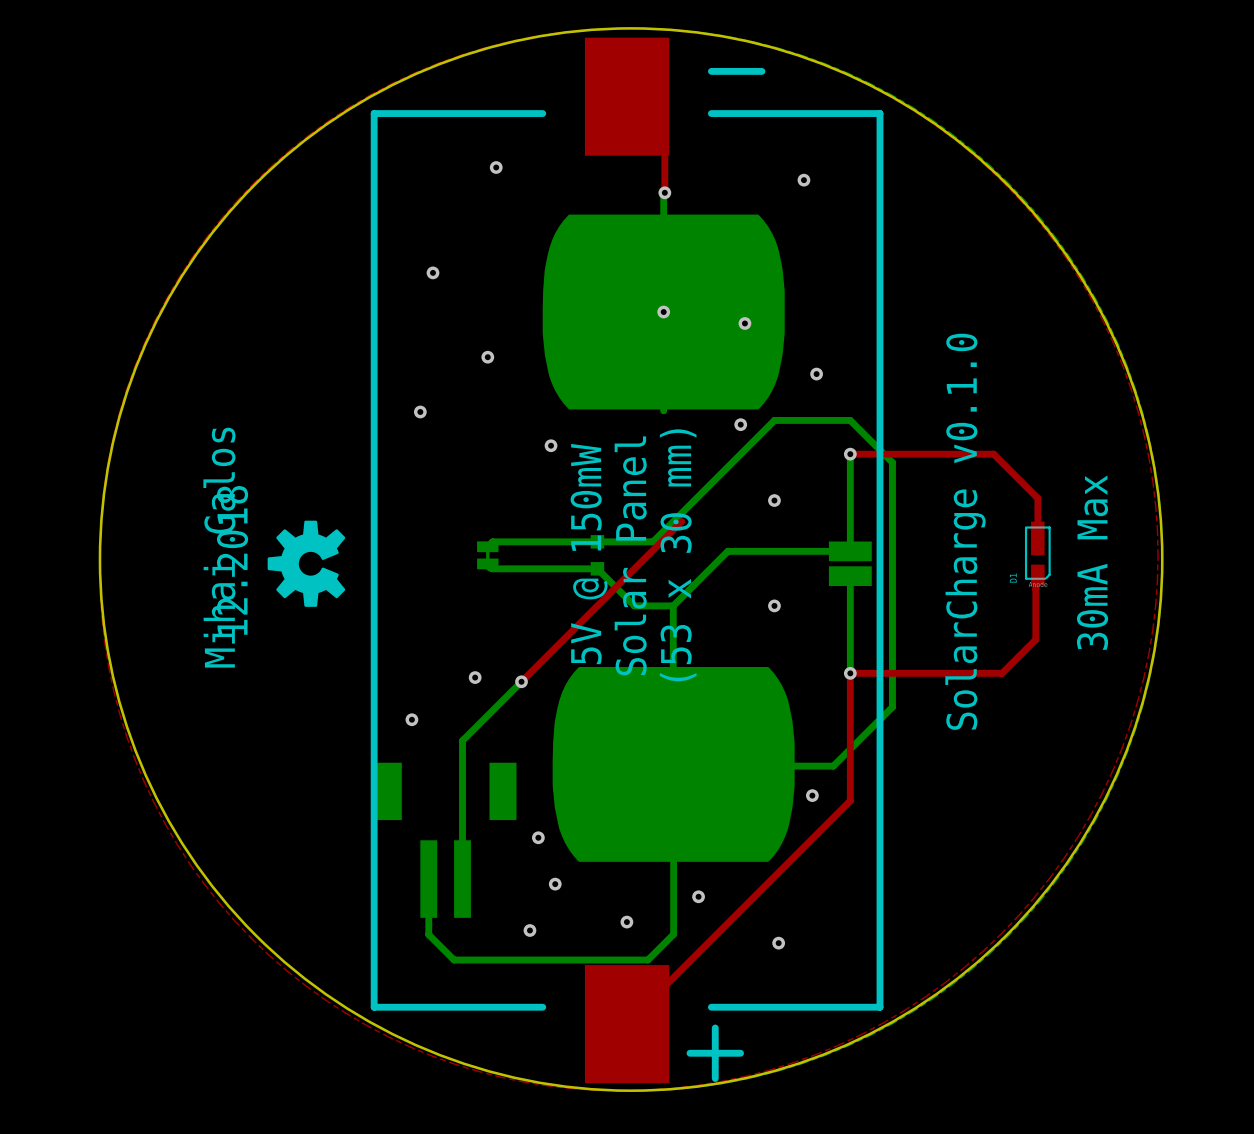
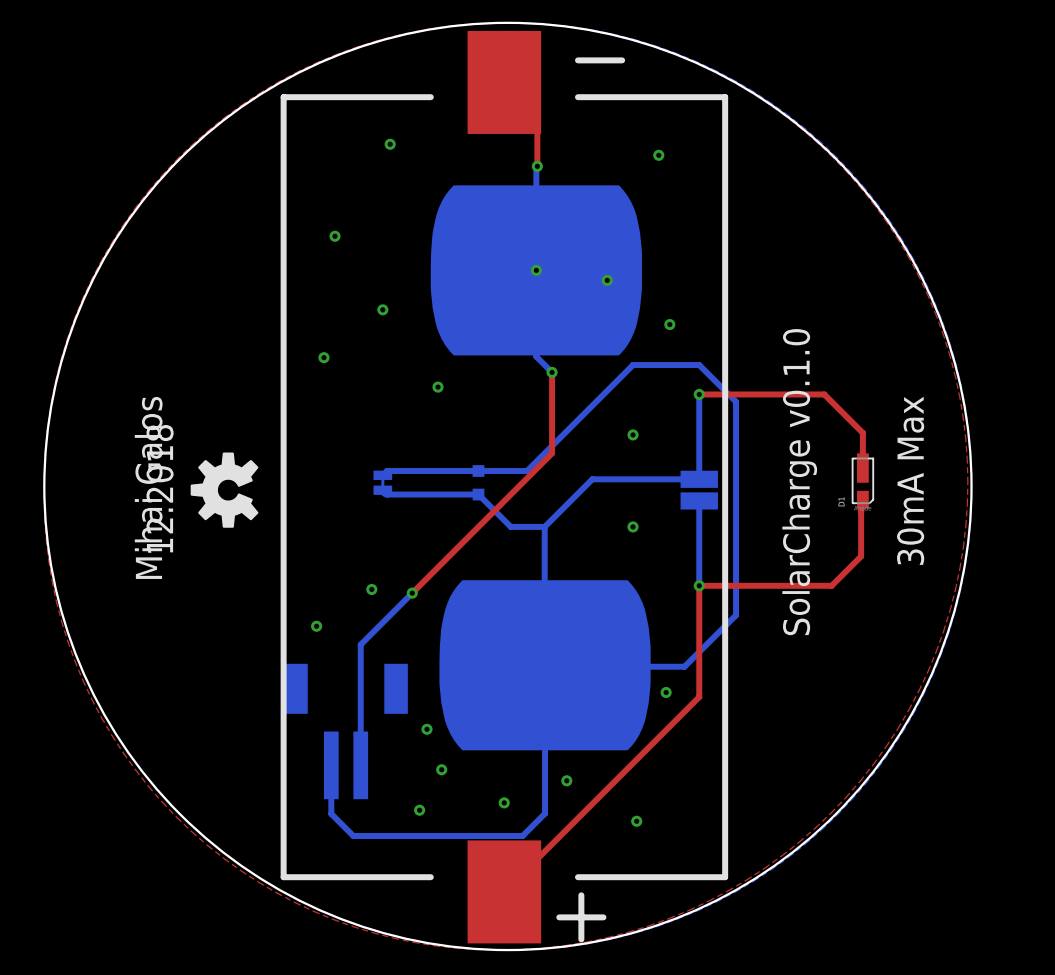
bottom track: none -> (536, 356) (552, 372)
via position: (740, 424) -> (552, 372)
top track: none -> (552, 372) (552, 453)
text: 5V @ 150mW (589, 554) -> none
text: Solar Panel (630, 555) -> none
text: (53 x 30 mm) (678, 555) -> none

